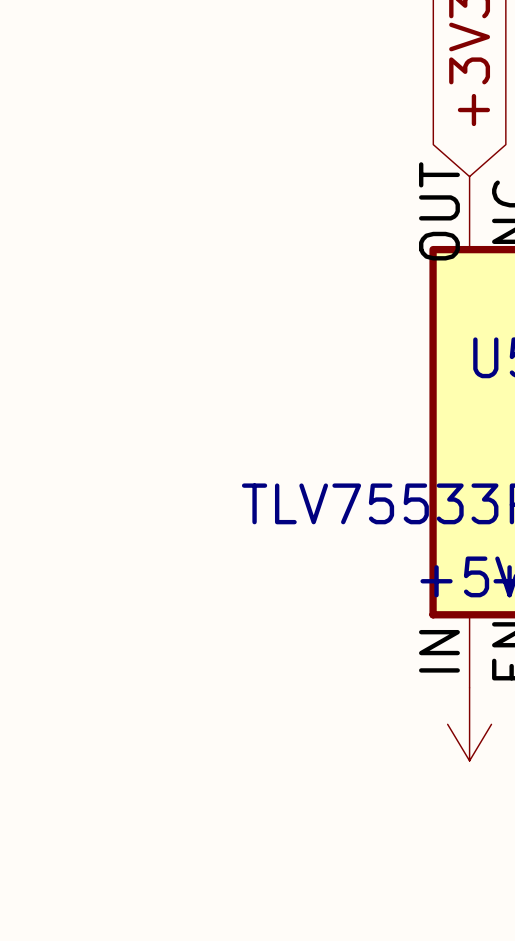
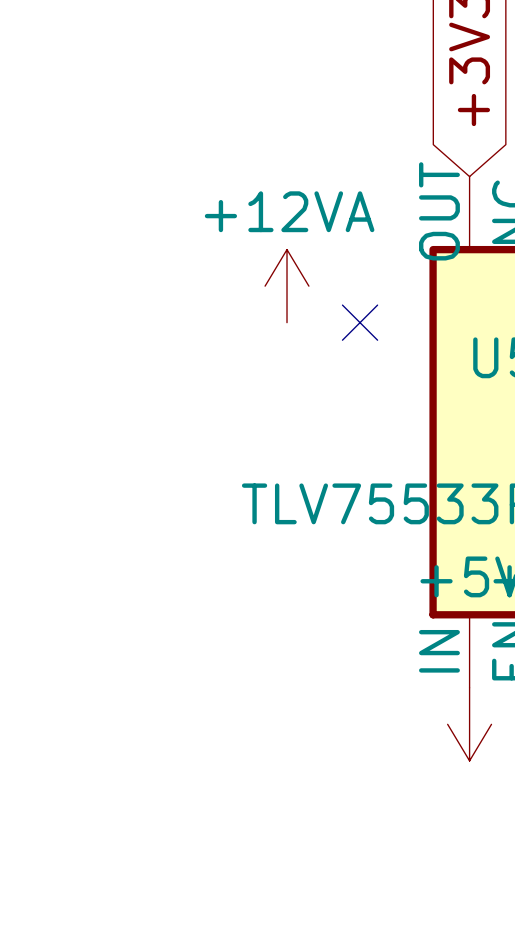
power symbol: none -> +12VA (287, 286)
no-connect mark: none -> (360, 322)

